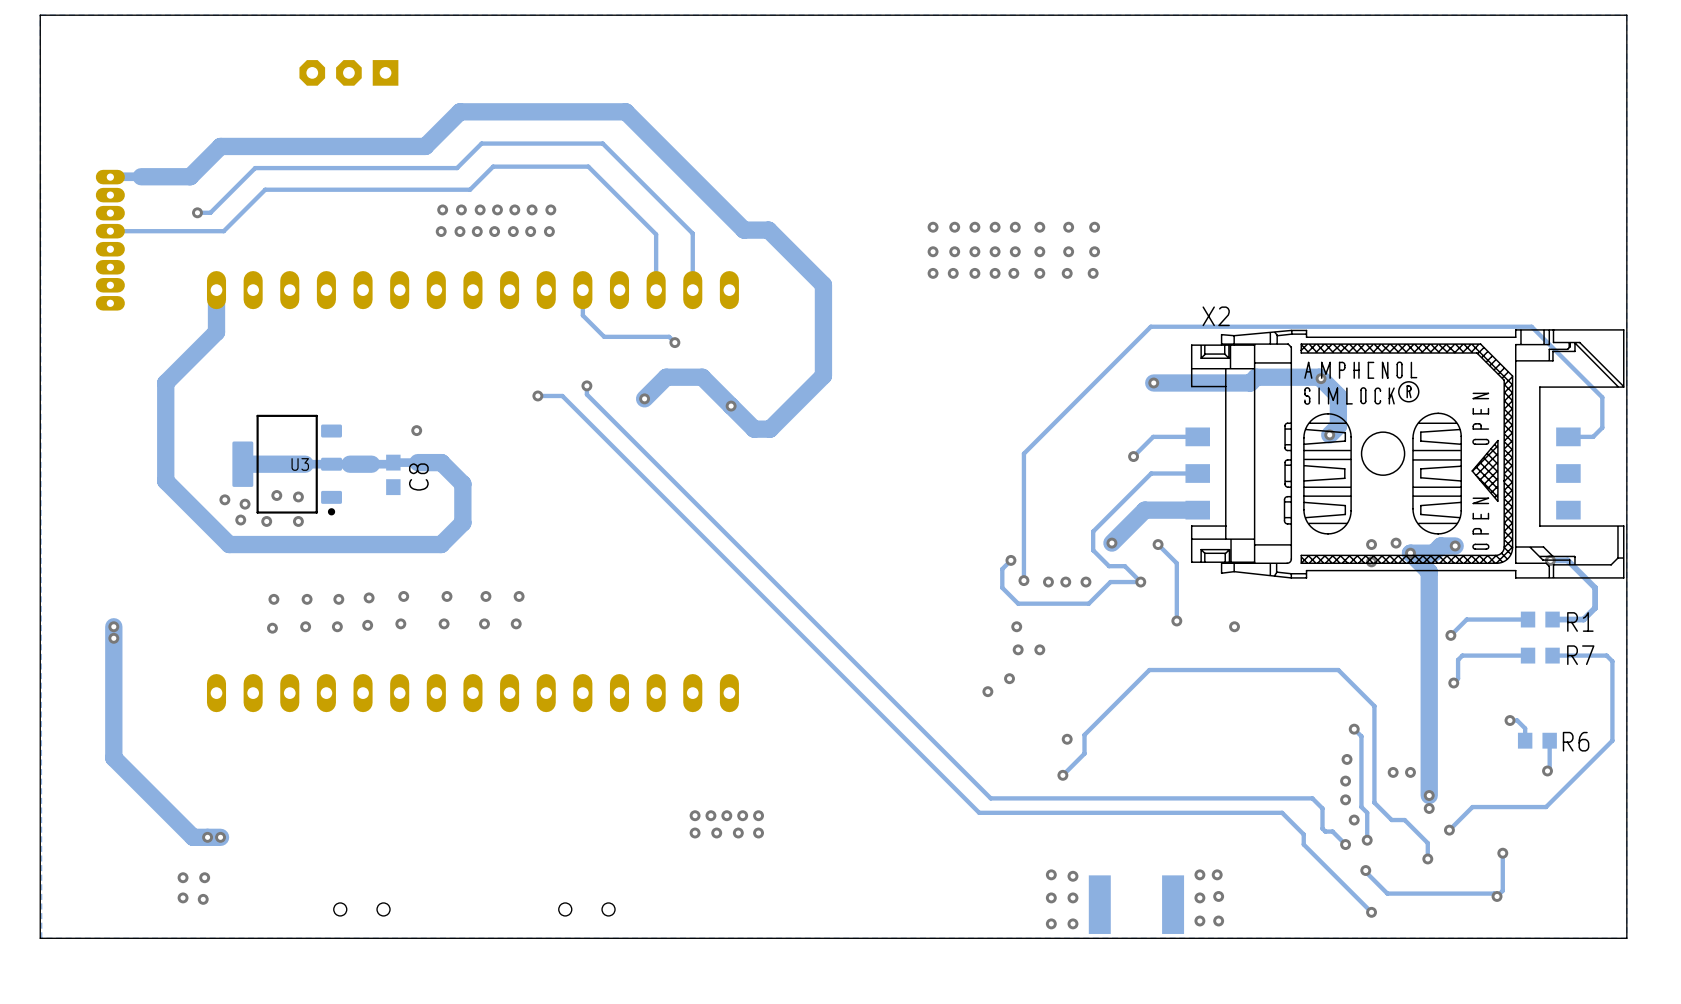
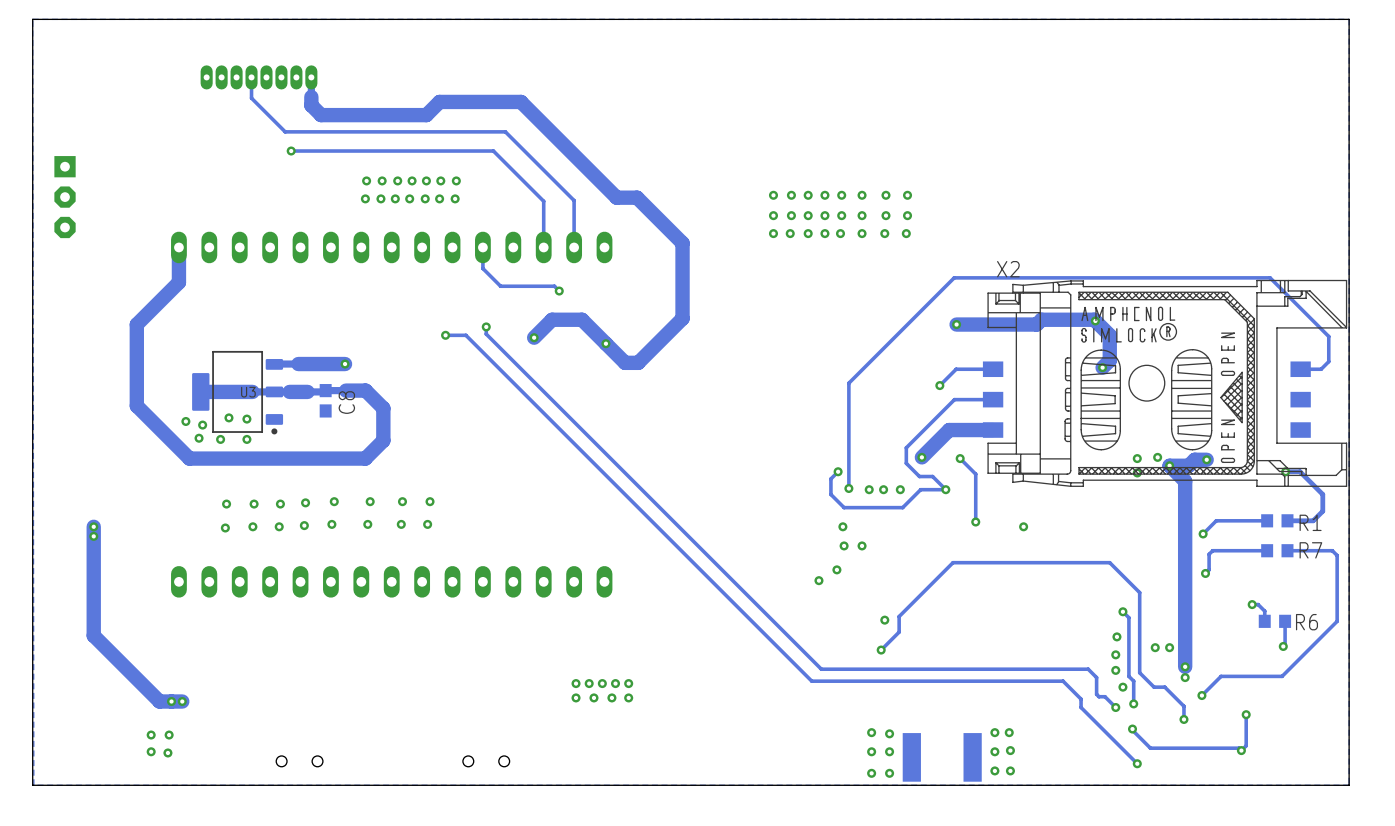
part rotation: 0° (348, 72) -> 90° counterclockwise (65, 197)
part position: (348, 72) -> (65, 197)
track: (628, 114) (625, 111) (459, 111) (425, 146) (220, 146) (190, 176) (110, 177) -> (520, 101) (439, 101) (426, 115) (321, 115) (311, 105) (311, 77)
track: (609, 150) (602, 143) (481, 143) (457, 168) (255, 168) (210, 212) (197, 212) -> (505, 131) (285, 131) (251, 98) (251, 77)
via: none -> (291, 151)
track: (595, 173) (588, 166) (493, 166) (470, 189) (265, 189) (223, 231) (110, 231) -> (493, 151) (291, 151)
via: (197, 212) -> none
part rotation: 0° (110, 240) -> 90° clockwise (259, 77)
part position: (110, 240) -> (259, 77)
track: none -> (345, 364) (274, 364)

